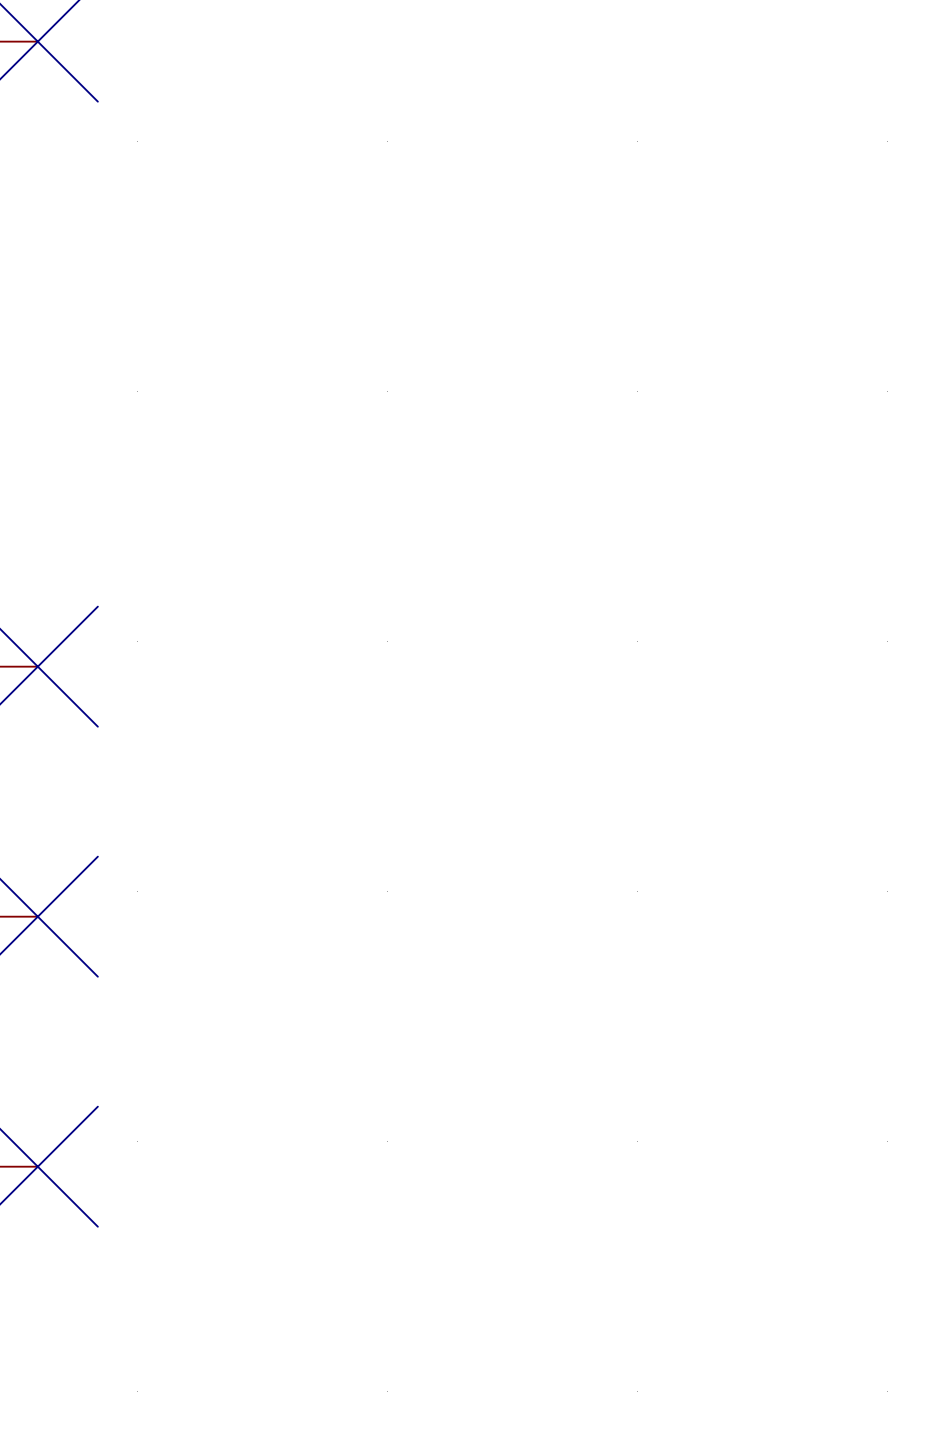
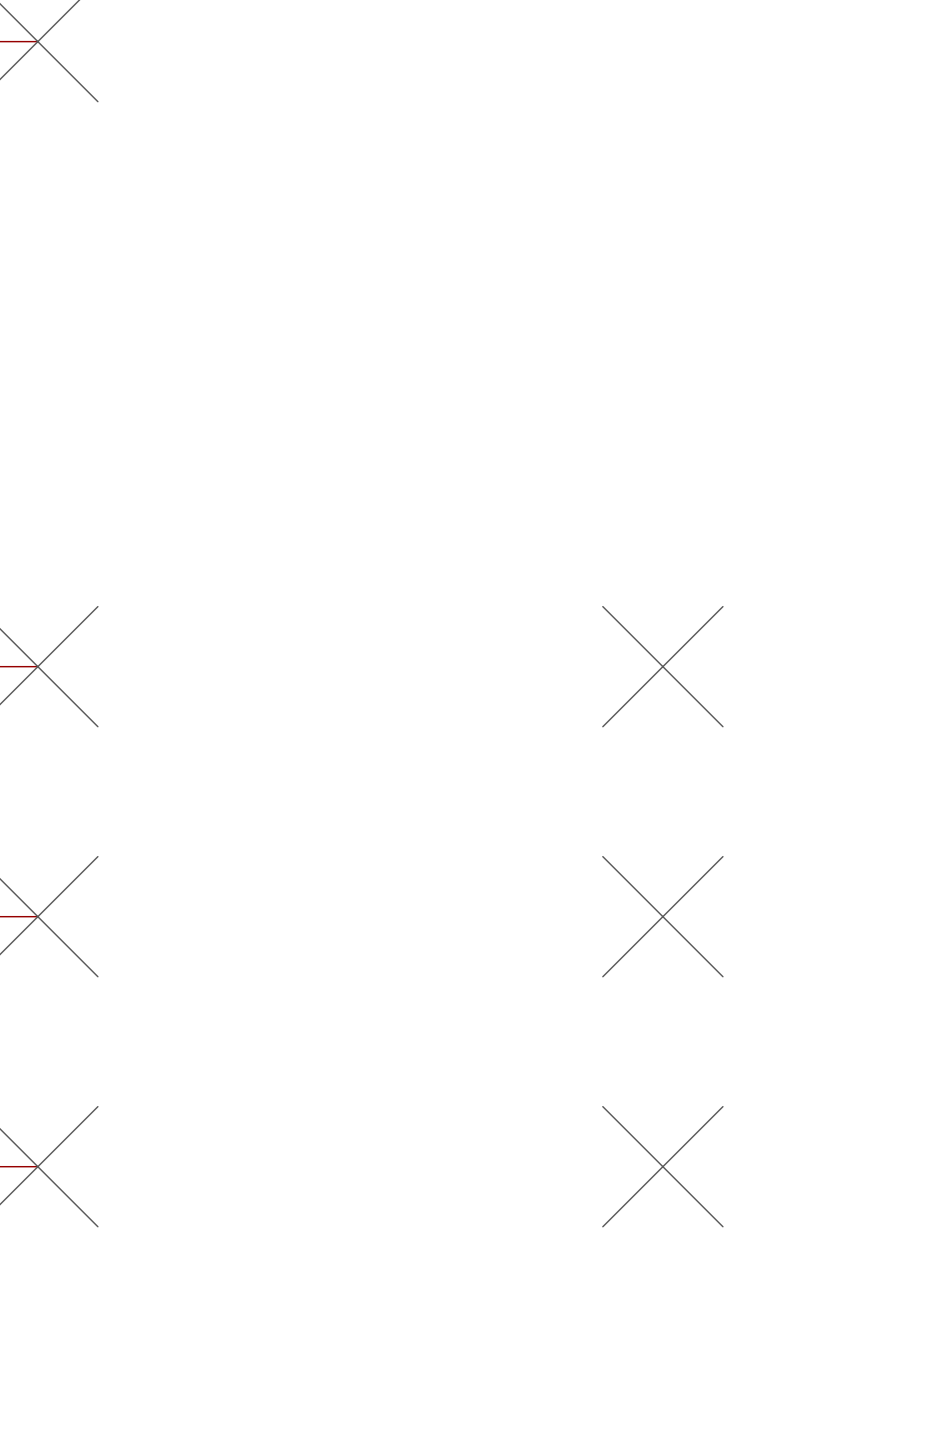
no-connect mark: none -> (662, 666)
no-connect mark: none -> (662, 916)
no-connect mark: none -> (662, 1166)

